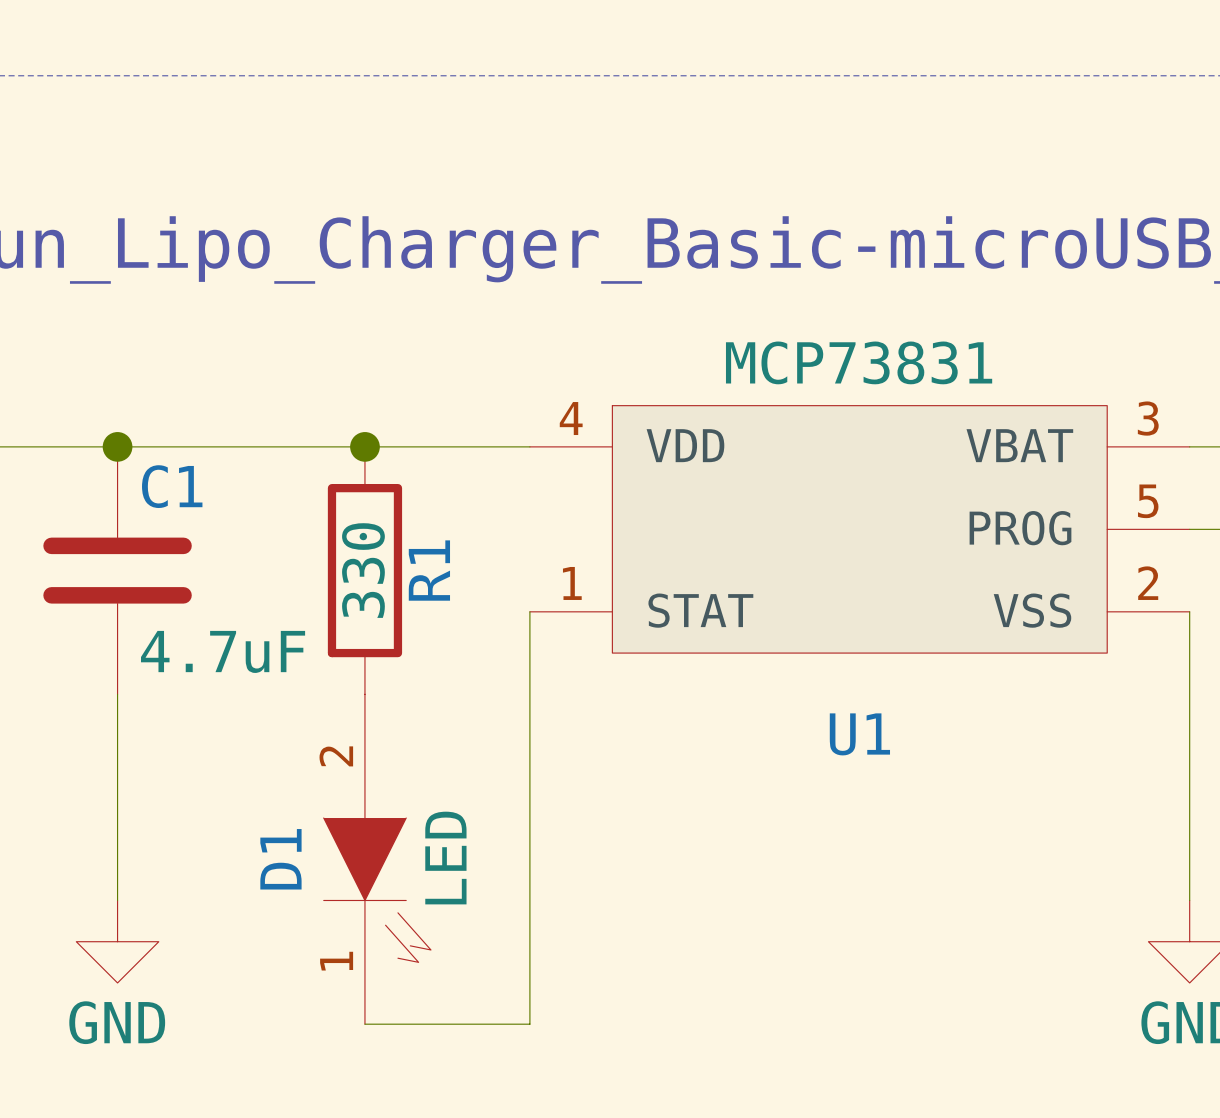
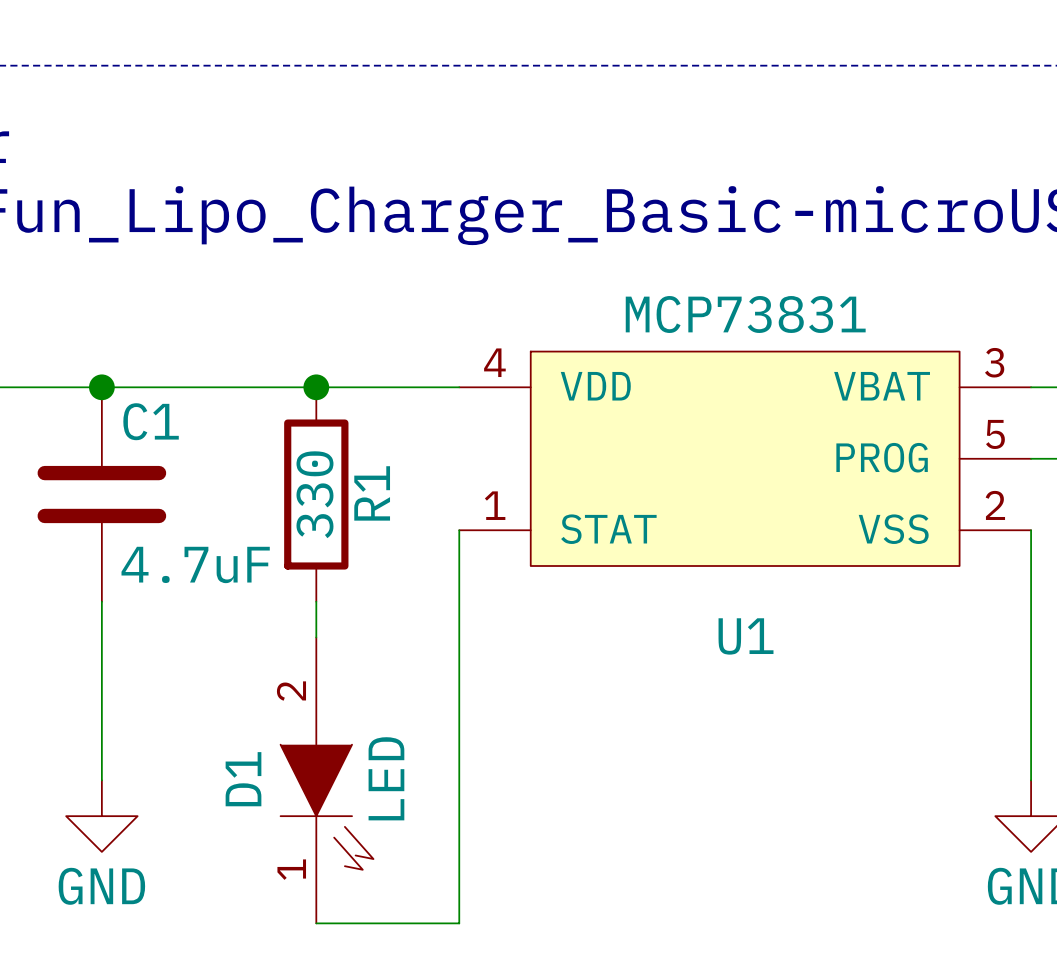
D1 position: (377, 859) -> (327, 780)
wire: (364, 1024) (529, 1024) -> (316, 923) (459, 923) (459, 887)

